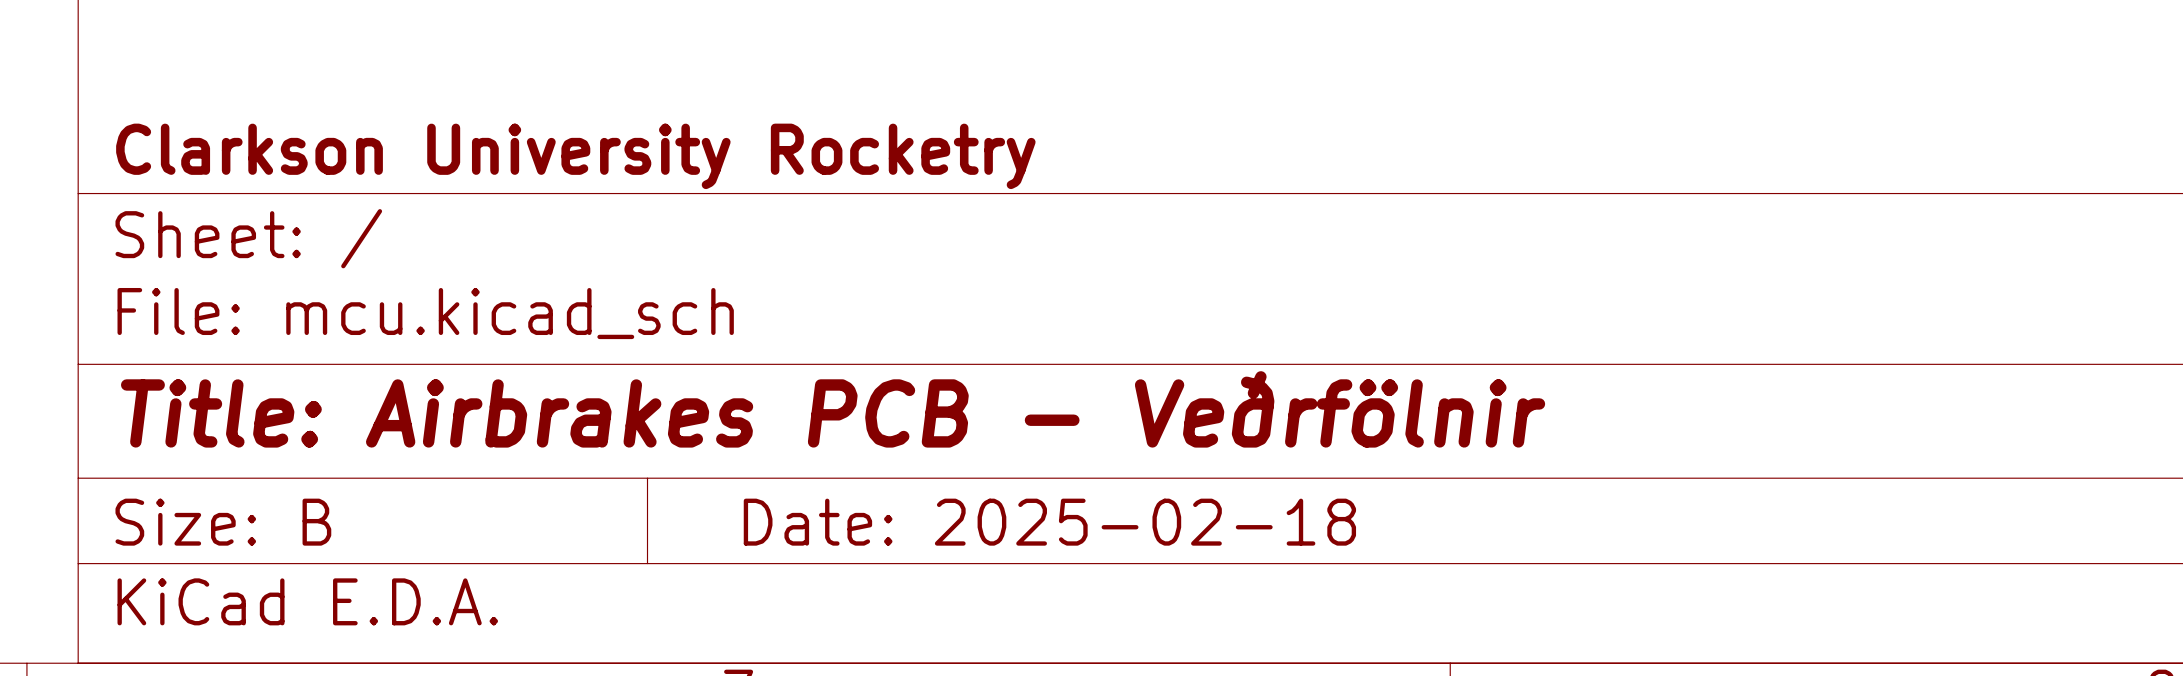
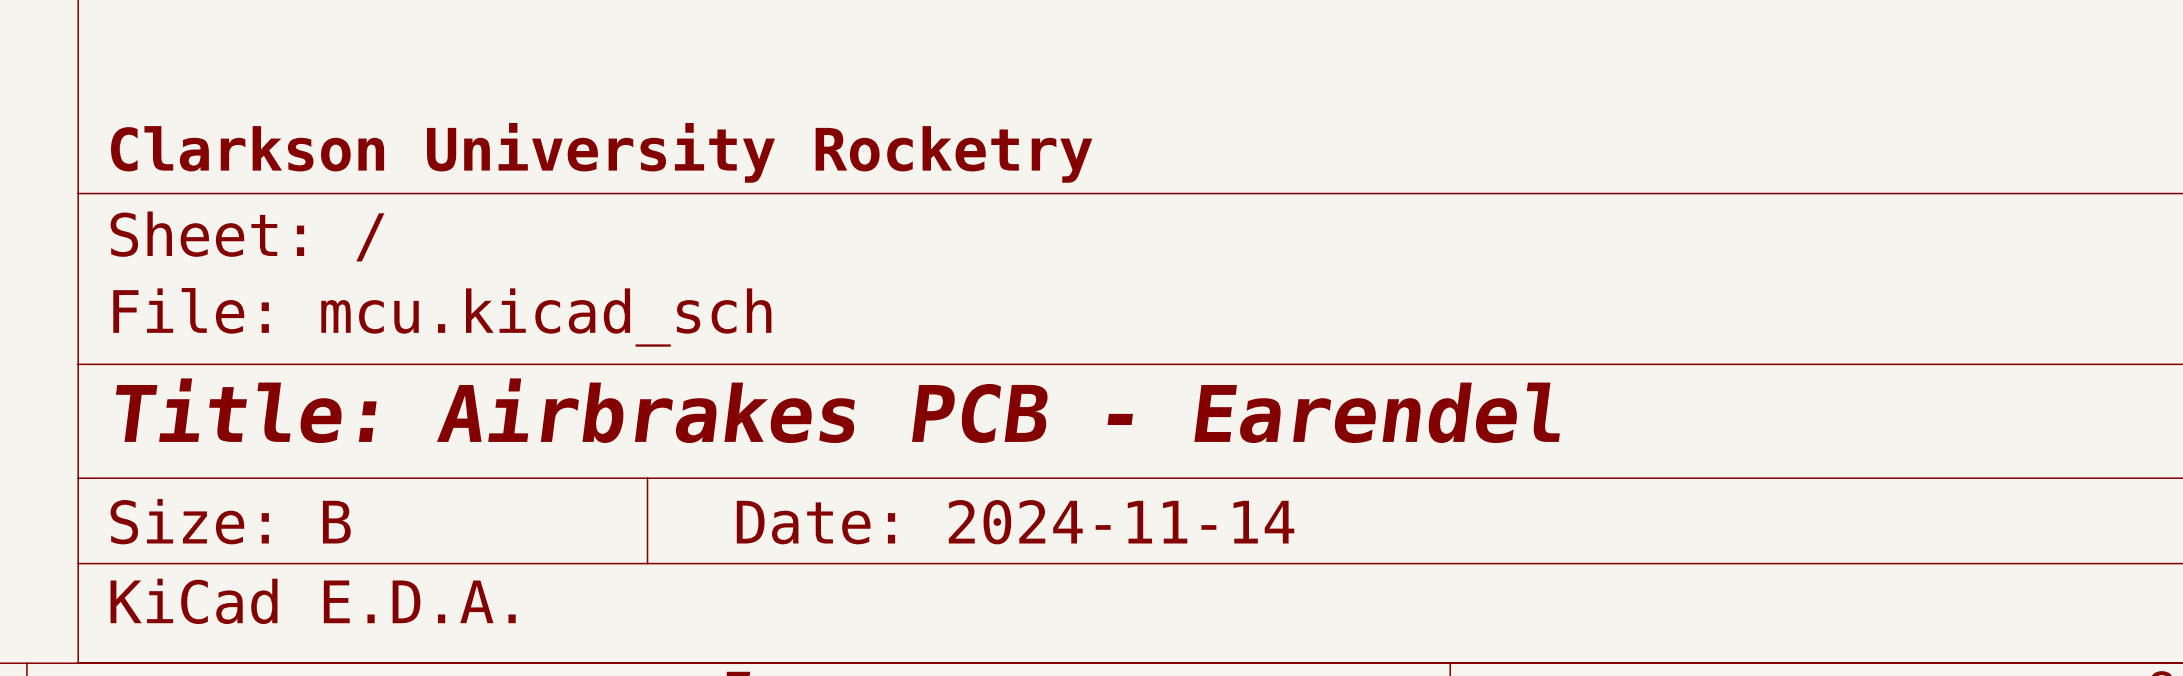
title block: Title: Airbrakes PCB - Veðrfölnir (833, 409) -> Title: Airbrakes PCB - Earendel (837, 410)
title block: Date: 2025-02-18 (1049, 522) -> Date: 2024-11-14 (1015, 522)

